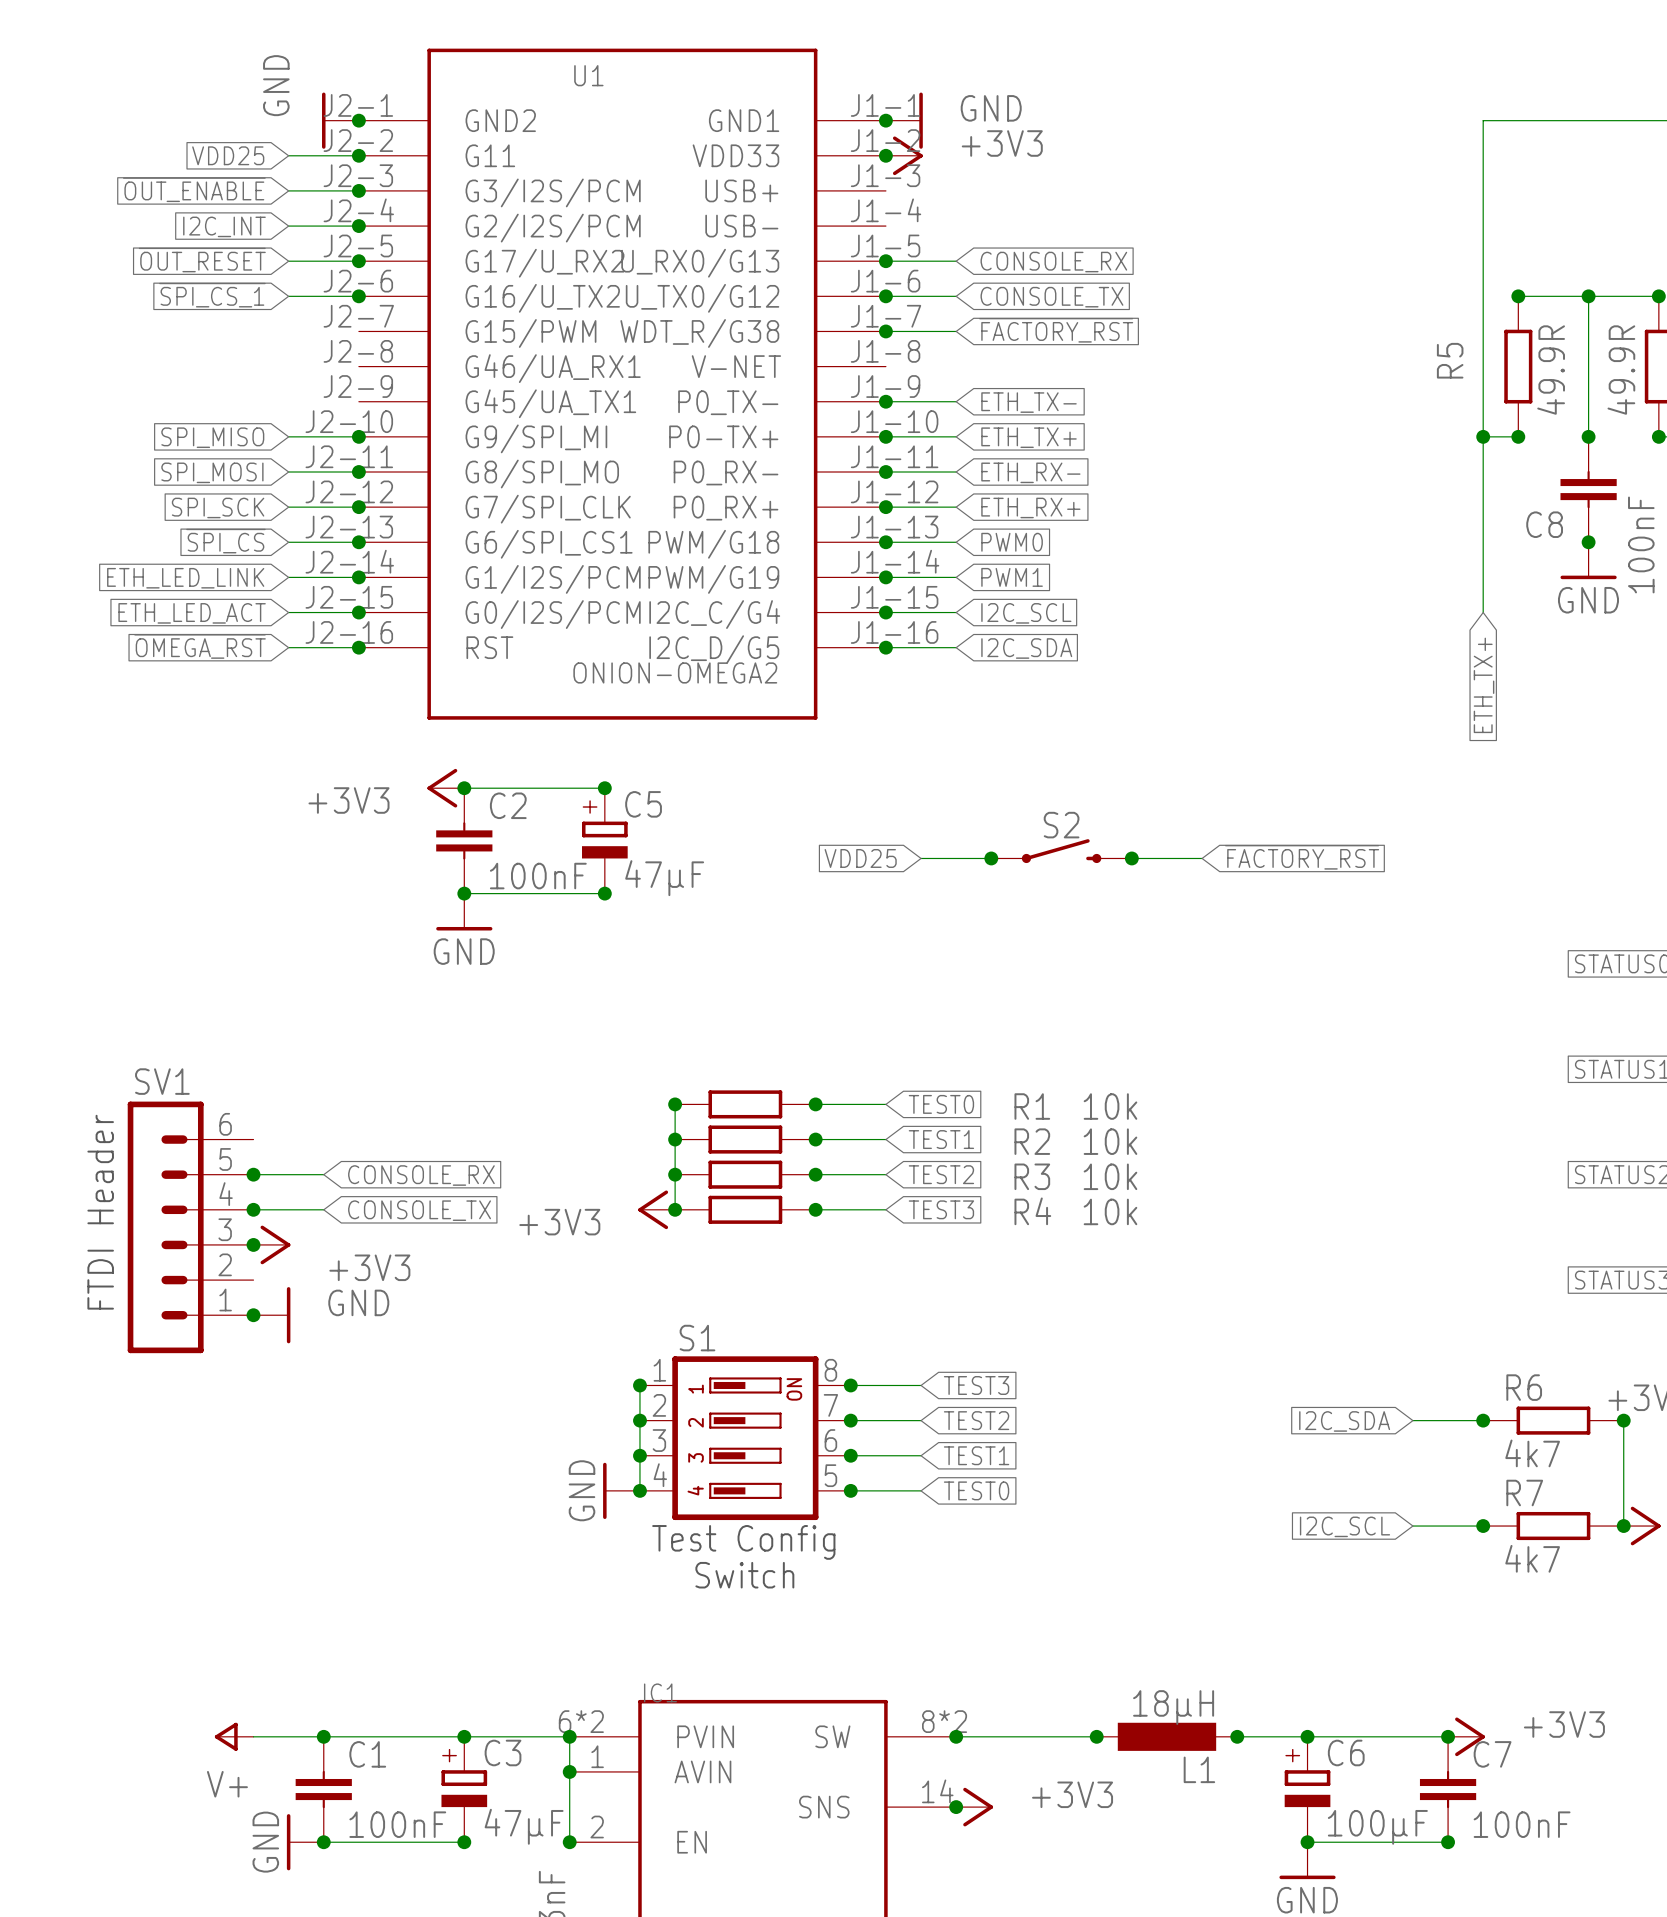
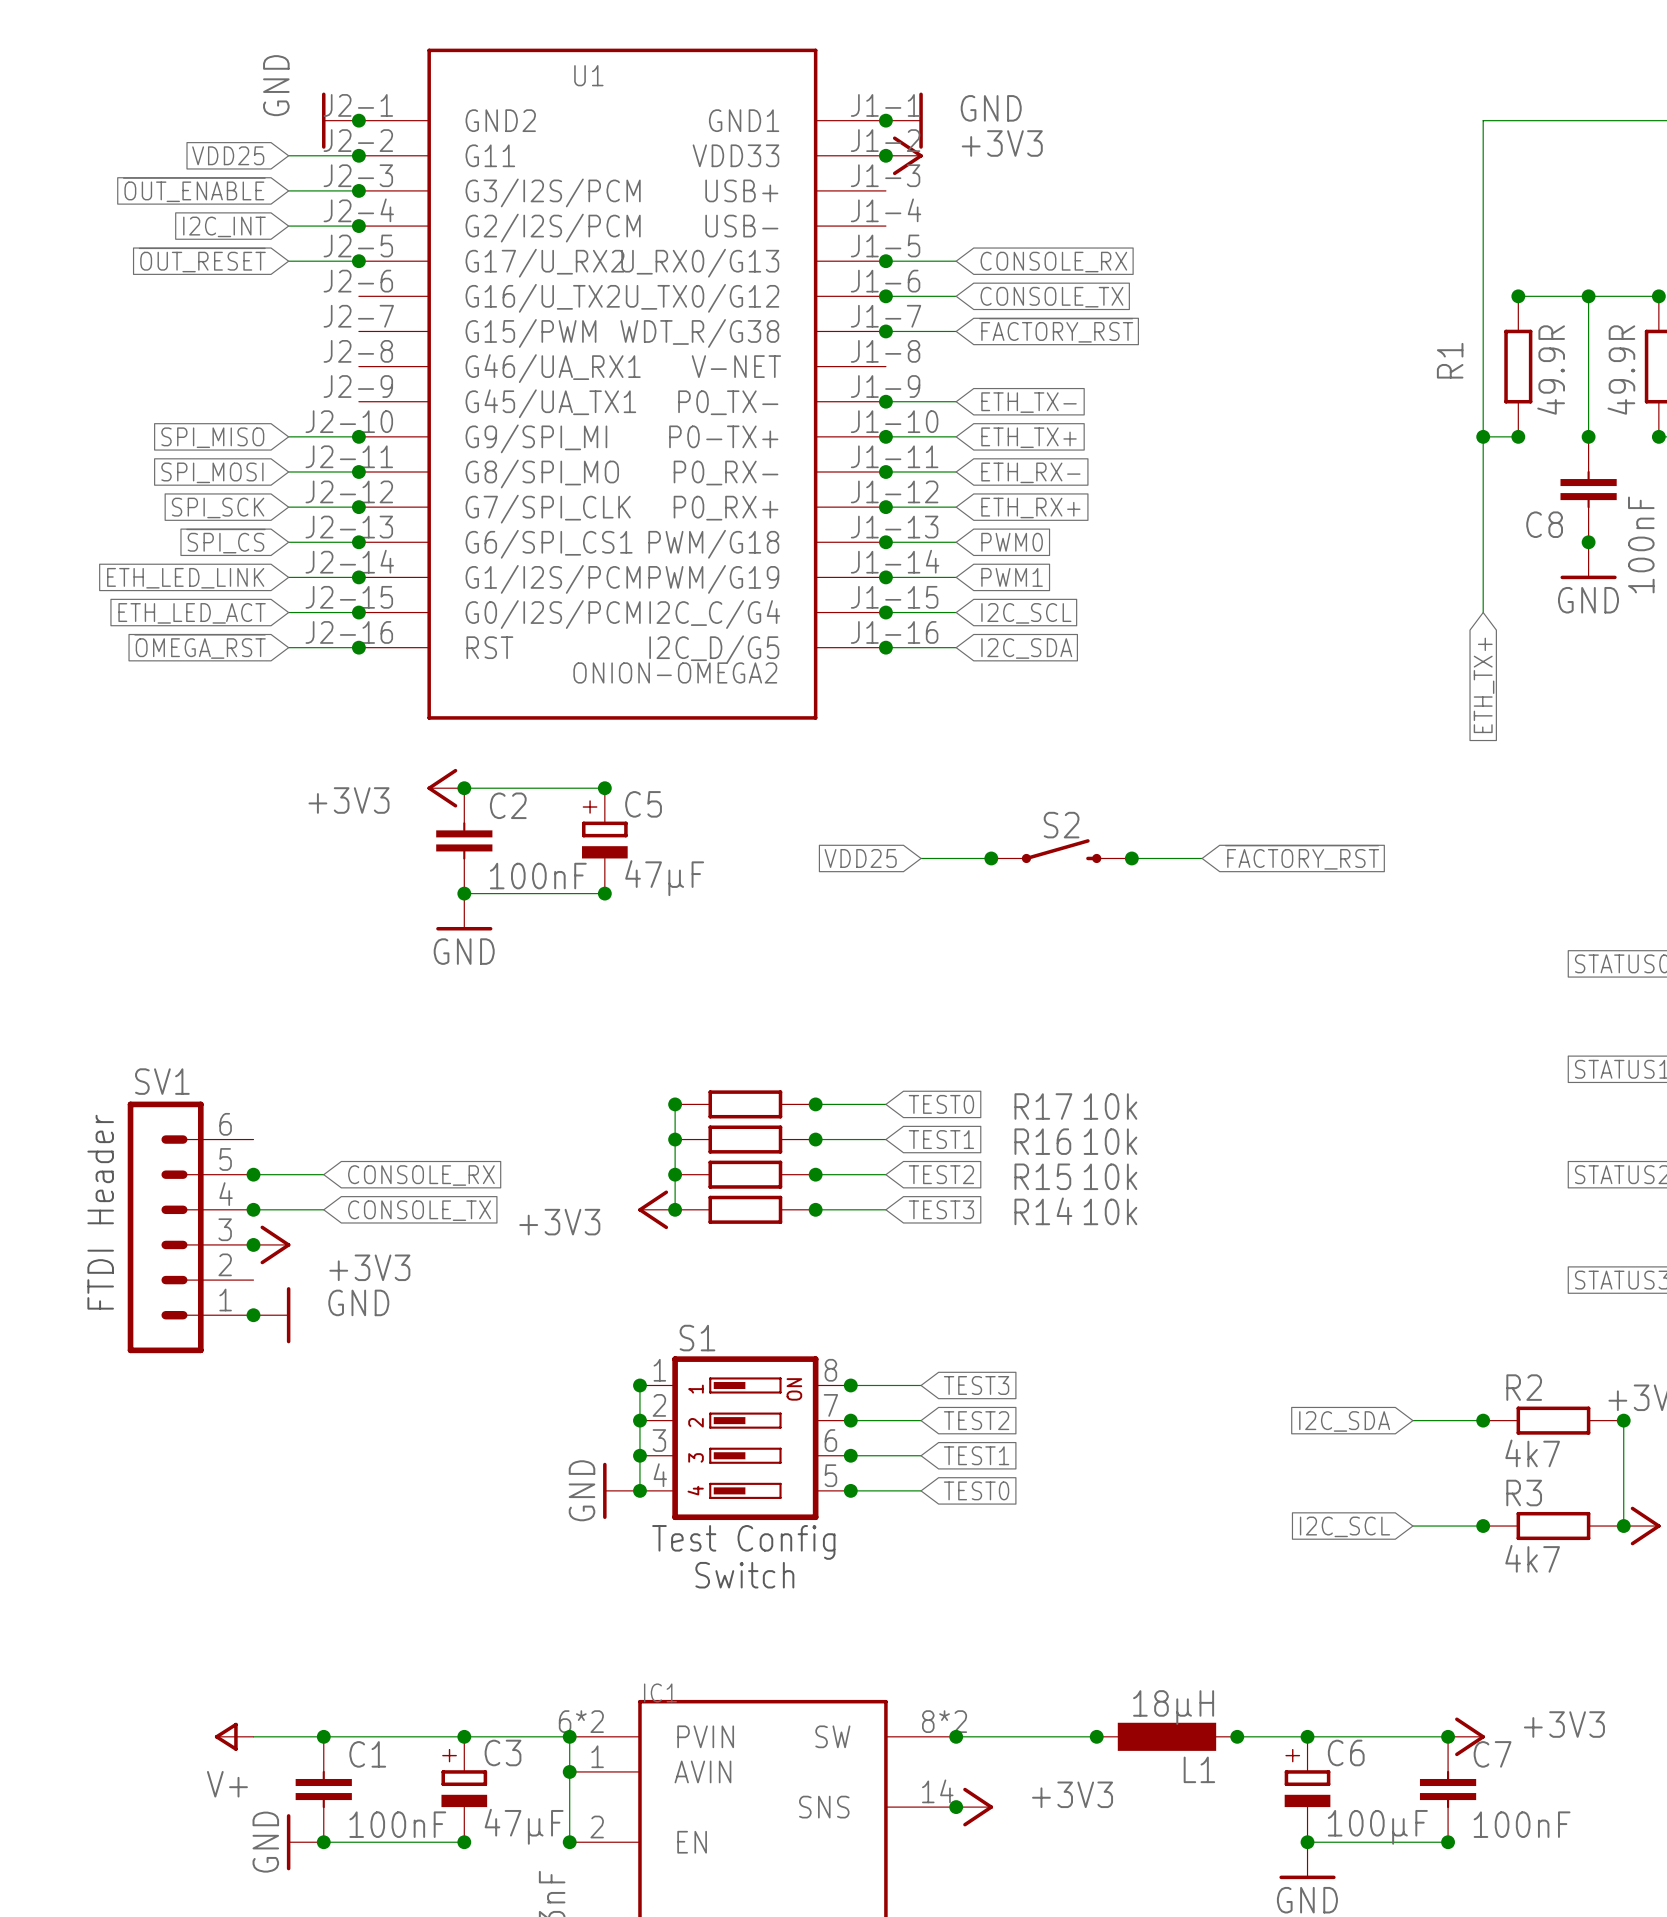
global label: ~{SPI_CS_1} (212, 295) -> none
wire: (288, 296) (358, 296) -> none
junction: (358, 296) -> none
R5 name: R5 (1450, 360) -> R1 (1450, 360)
R1 name: R1 (1032, 1106) -> R17 (1043, 1106)
R2 name: R2 (1032, 1141) -> R16 (1042, 1141)
R3 name: R3 (1032, 1176) -> R15 (1042, 1176)
R4 name: R4 (1032, 1211) -> R14 (1043, 1211)
R6 name: R6 (1524, 1387) -> R2 (1524, 1387)
R7 name: R7 (1524, 1492) -> R3 (1524, 1492)

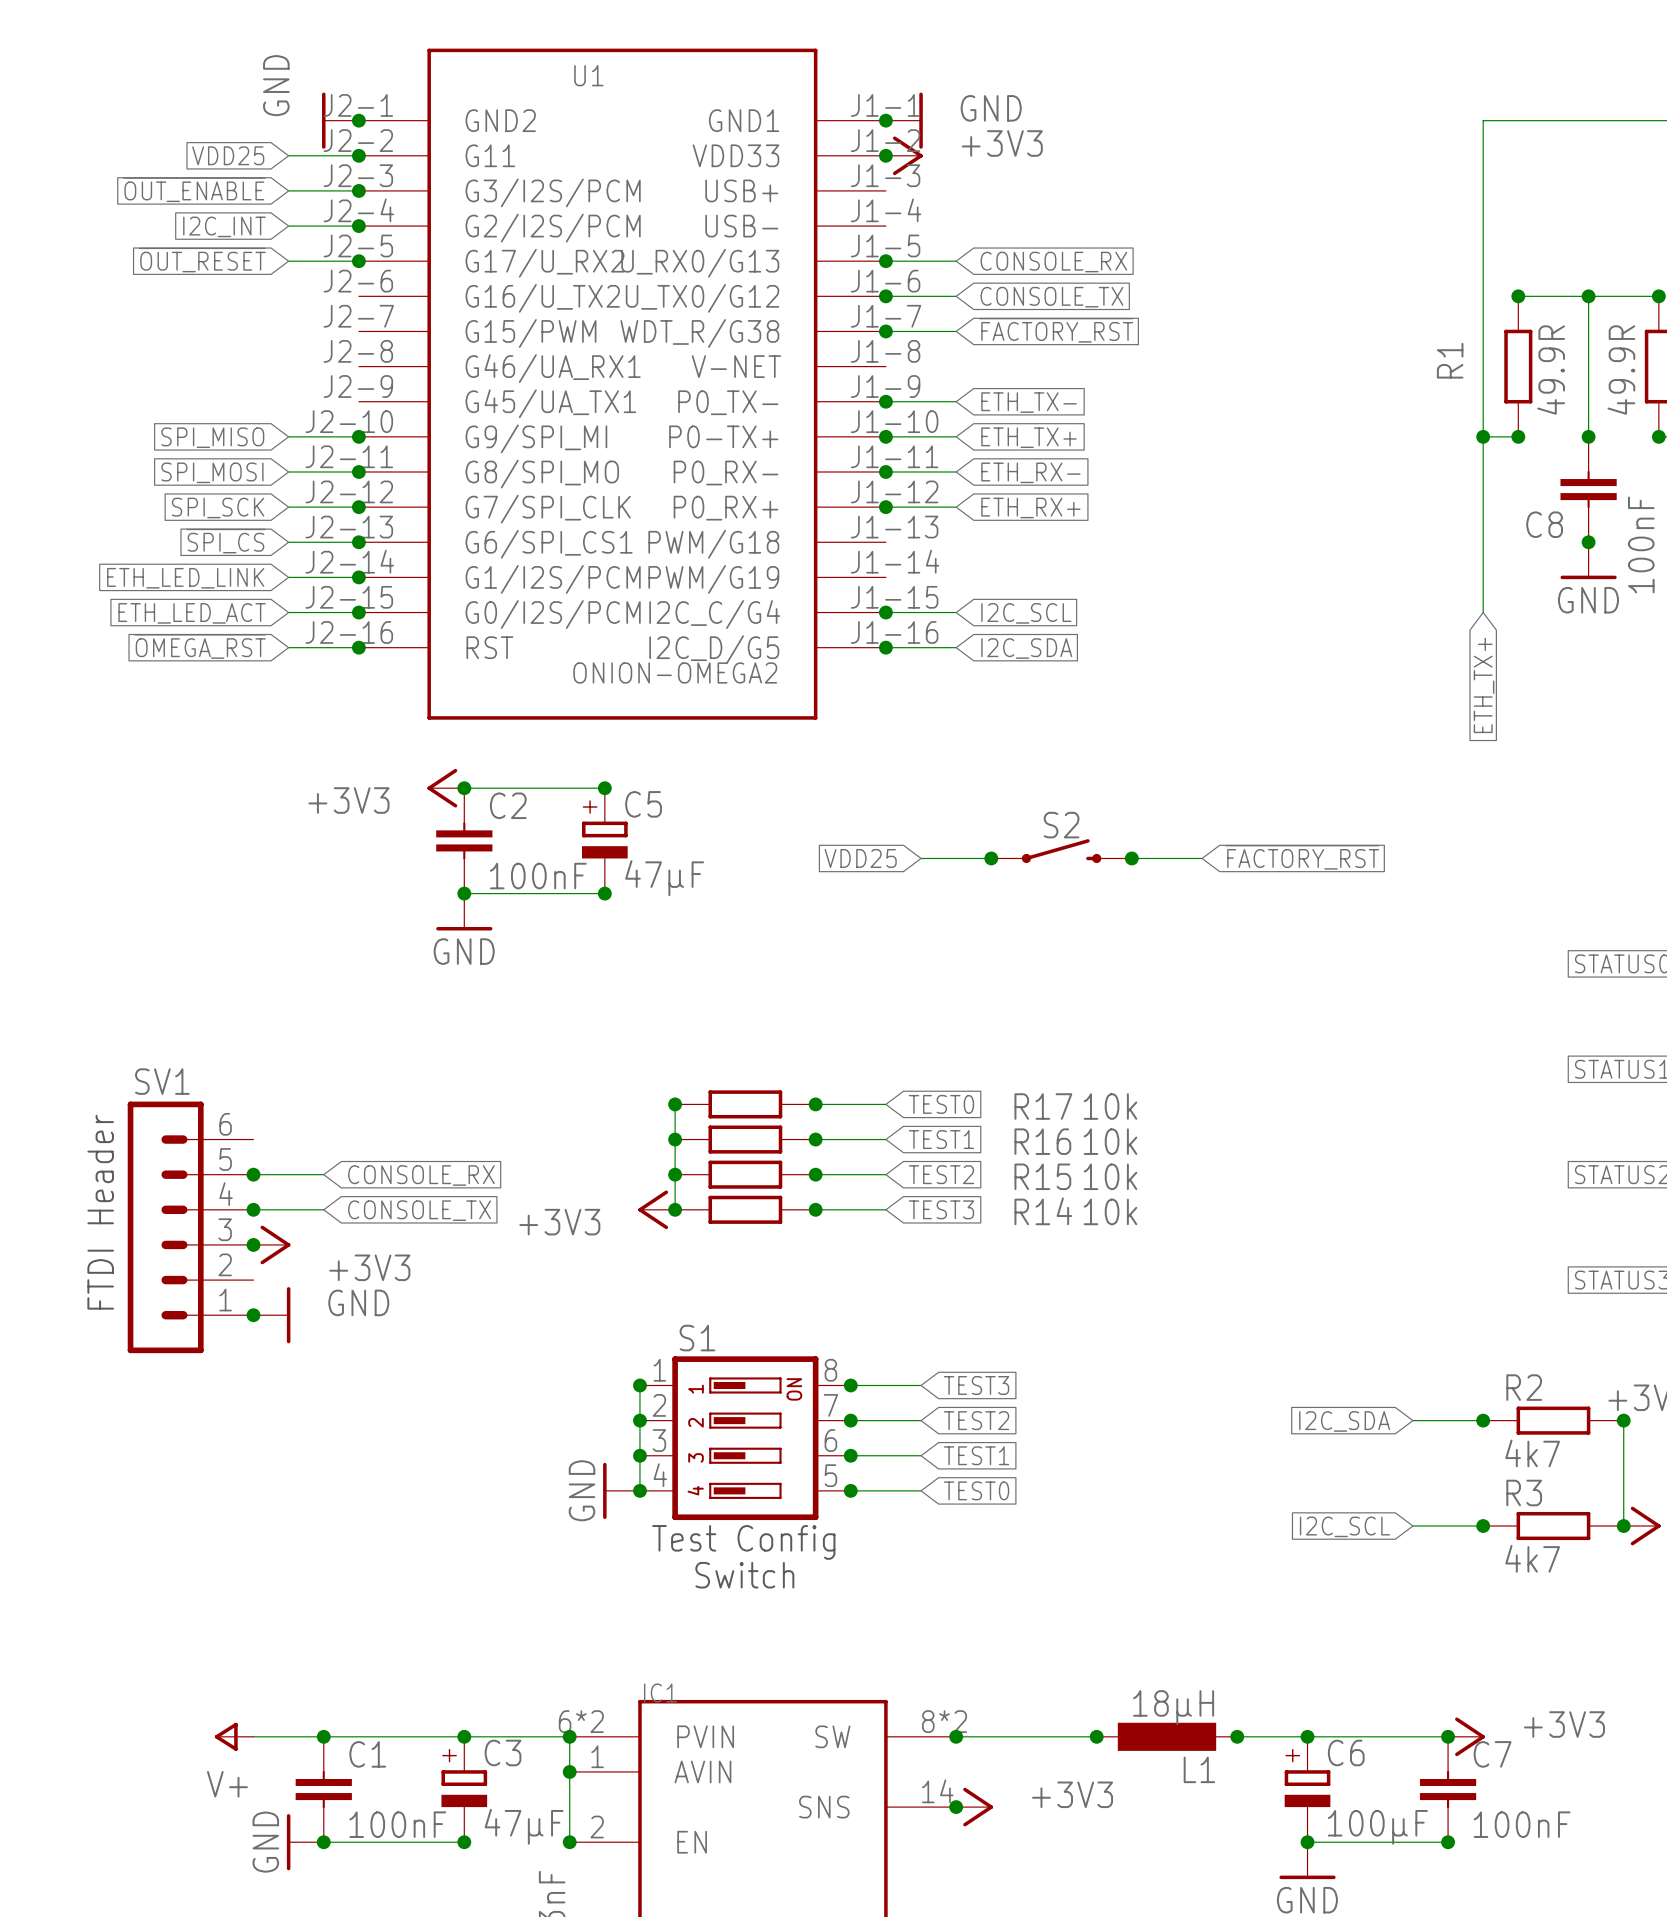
wire: (885, 542) (956, 542) -> none
junction: (885, 542) -> none
global label: PWM0 (1012, 542) -> none
wire: (885, 577) (956, 577) -> none
junction: (885, 577) -> none
global label: PWM1 (1012, 577) -> none

